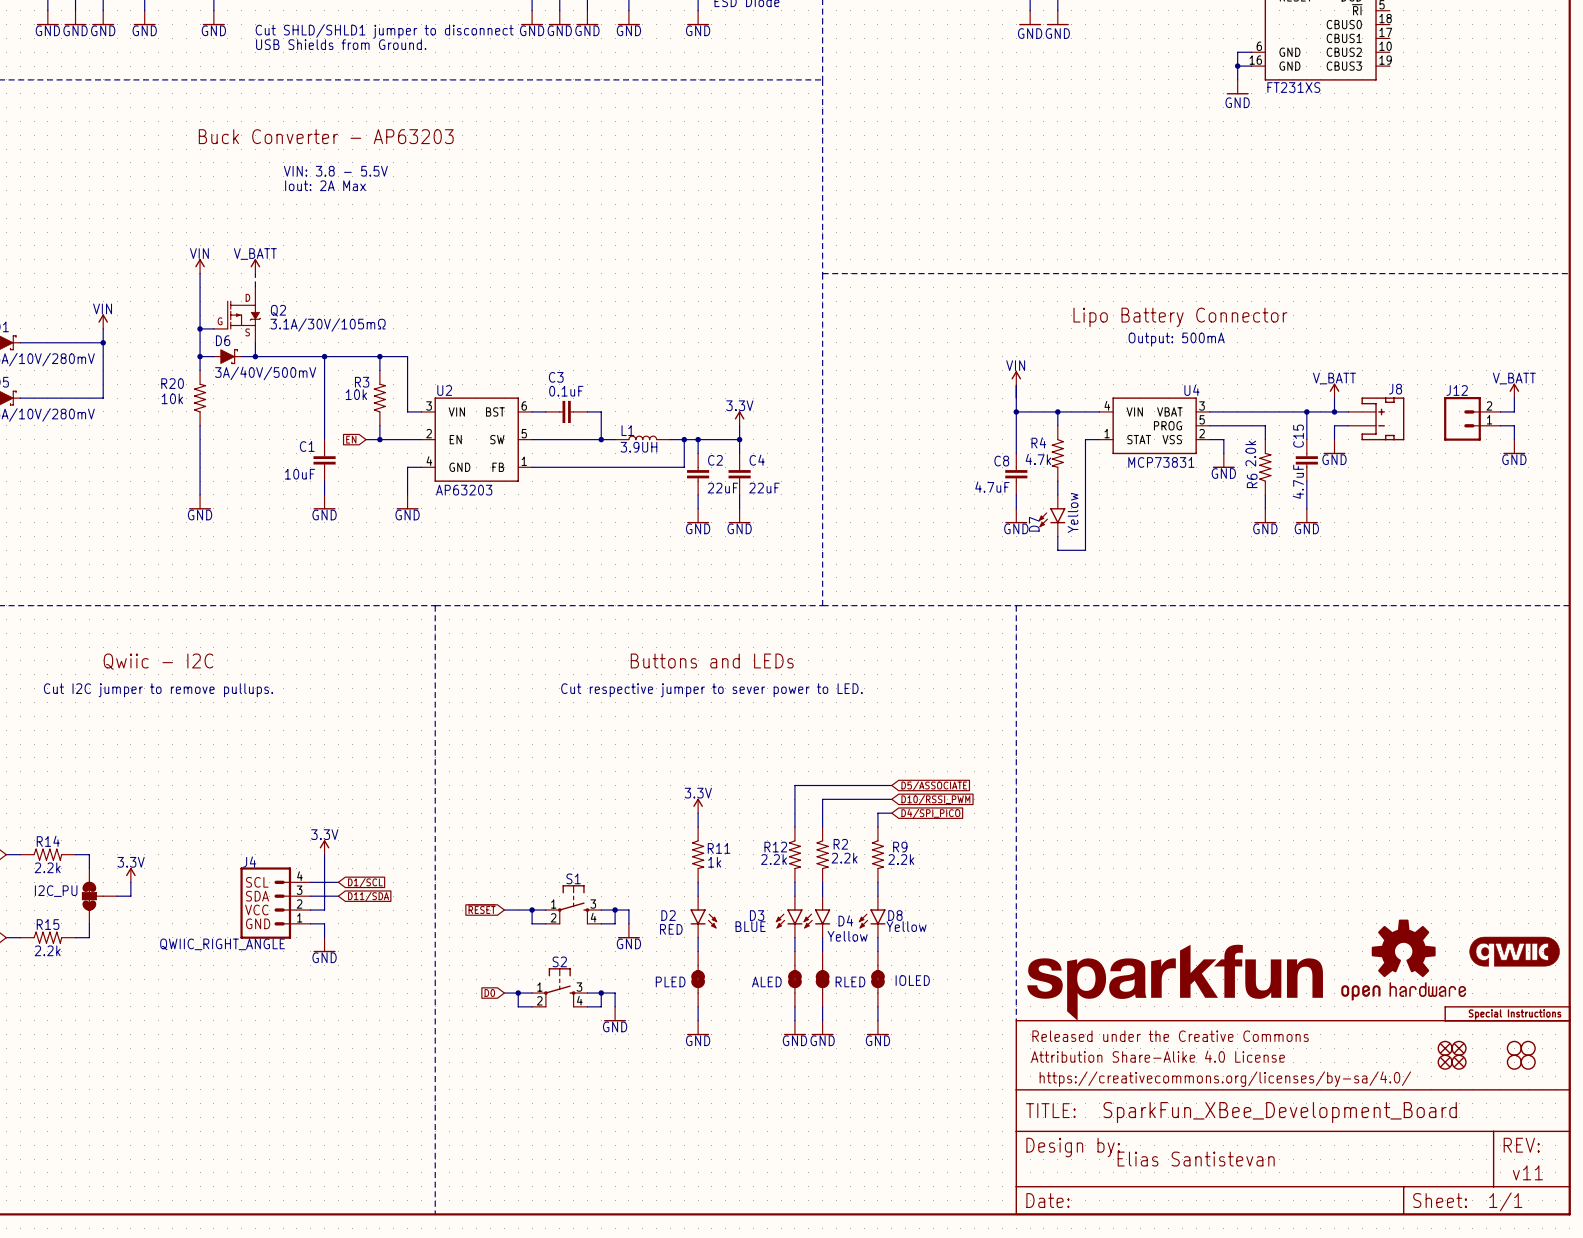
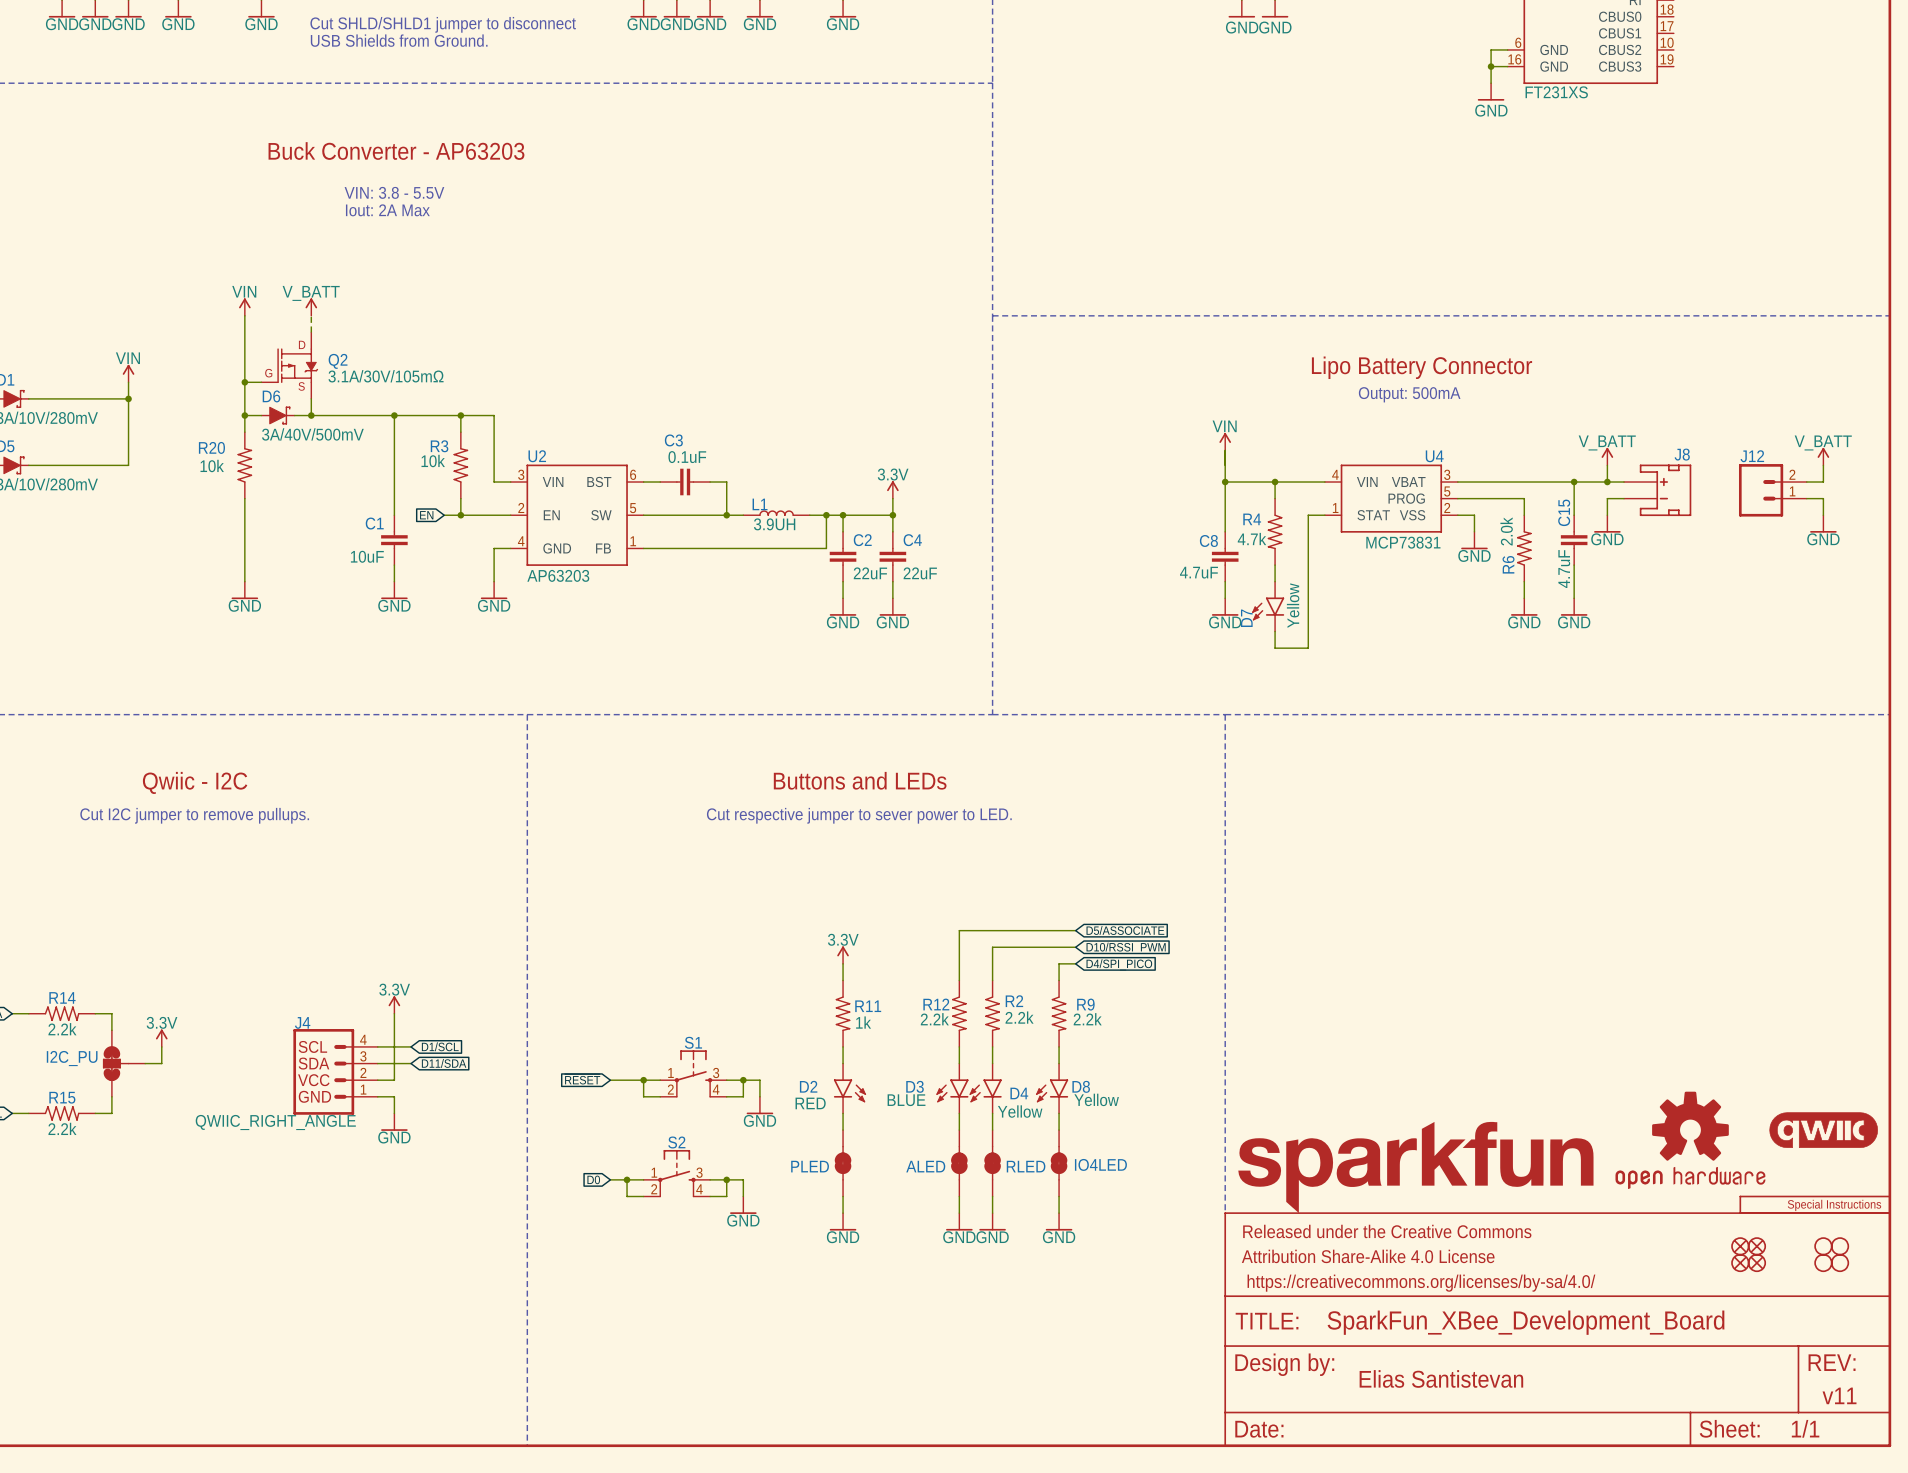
IOLED name: IOLED (912, 980) -> IO4LED (1100, 1164)

